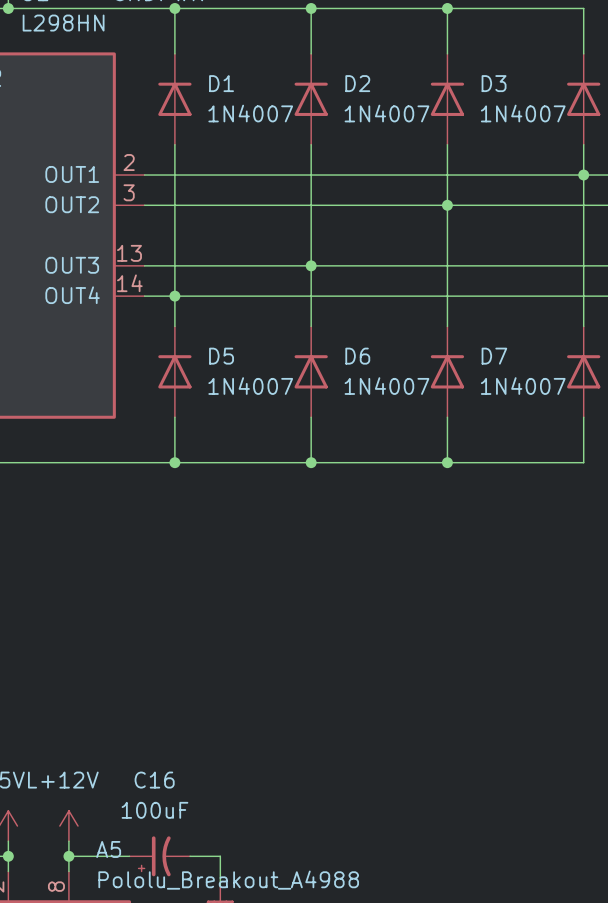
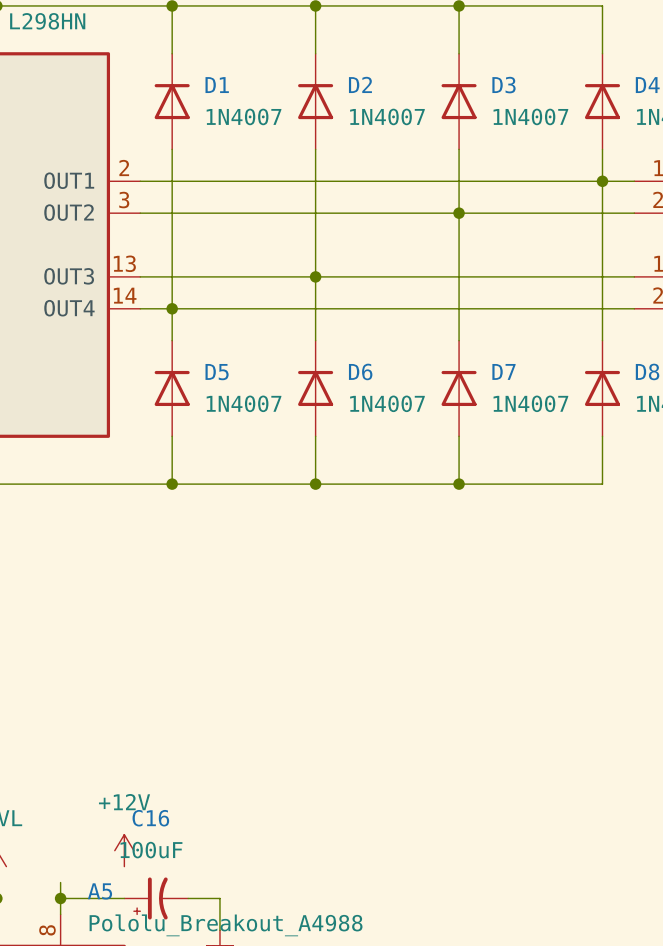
power symbol position: +12V (68, 826) -> +12V (124, 850)

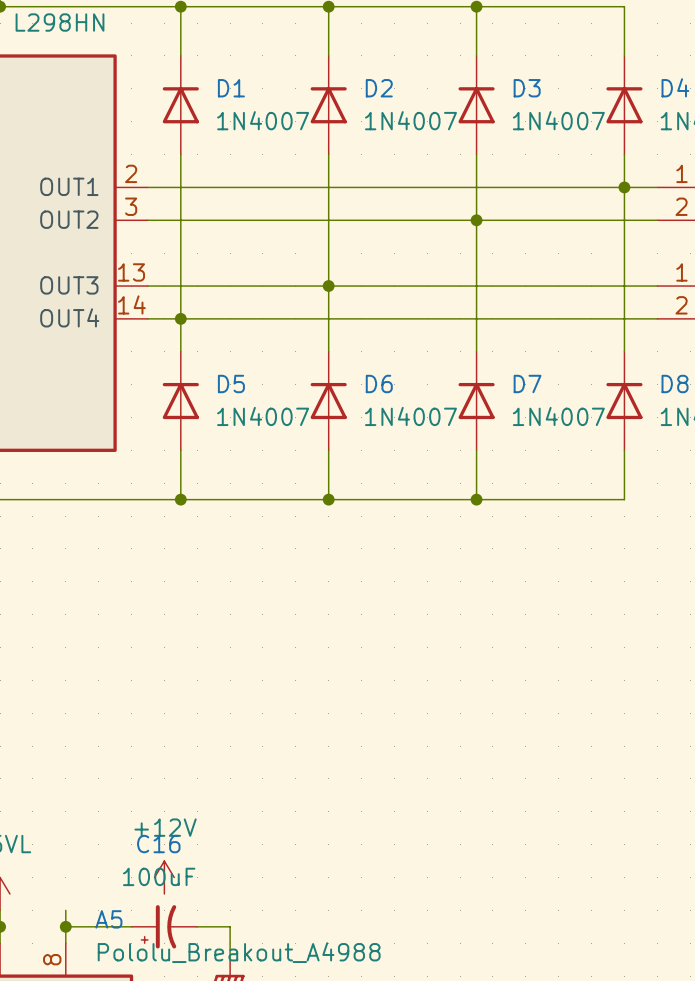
power symbol position: +12V (124, 850) -> +12V (164, 877)

